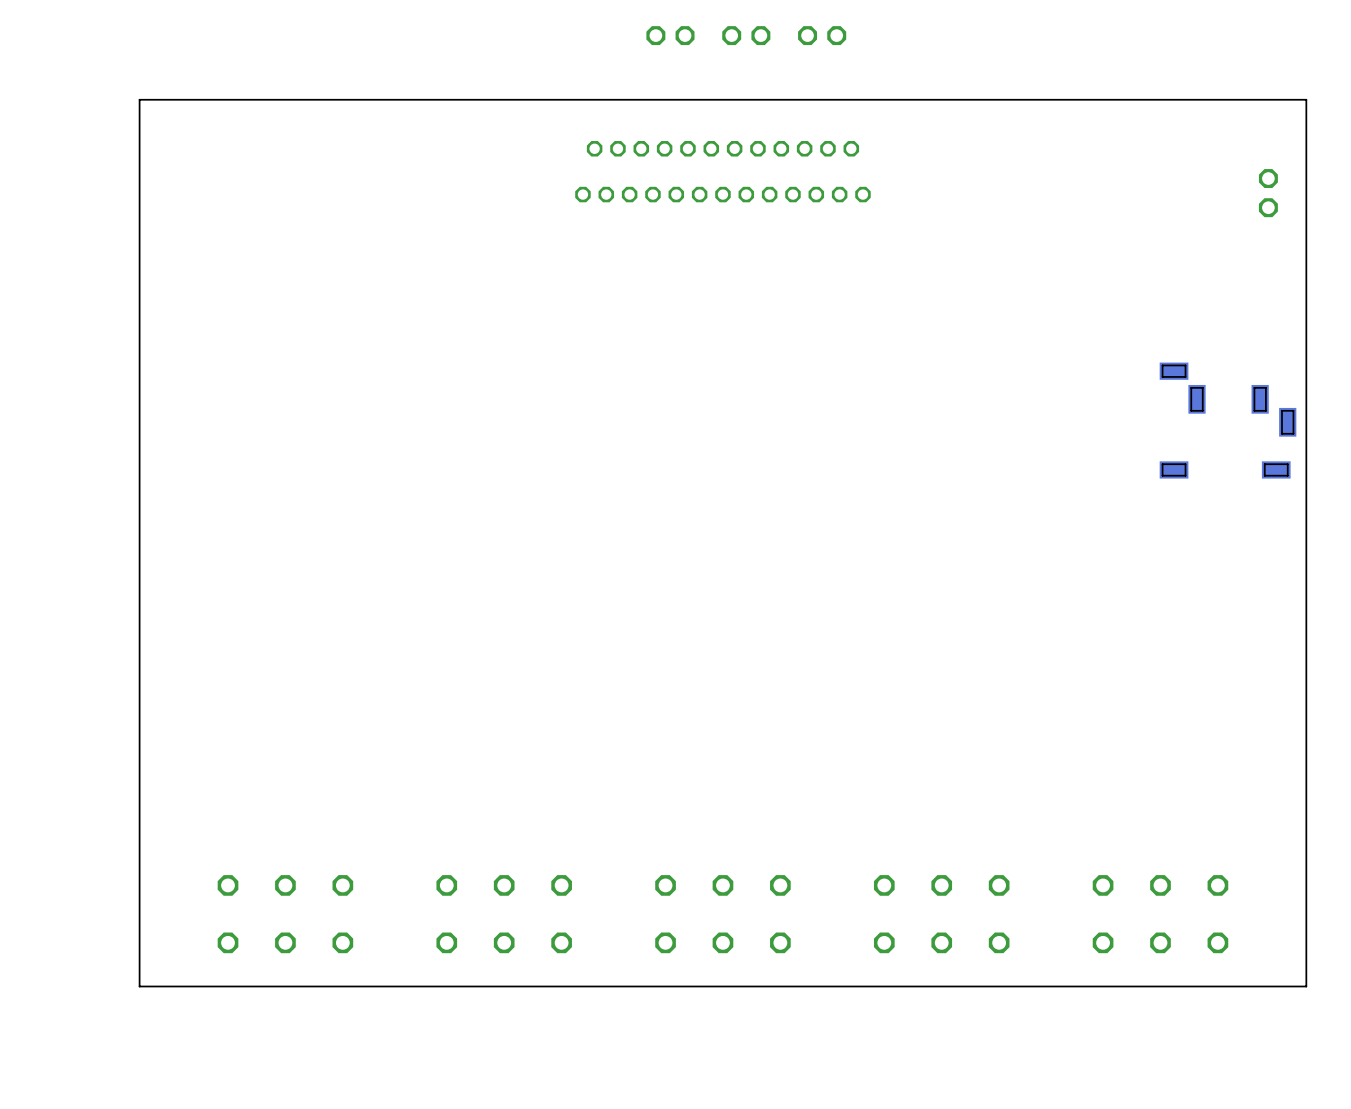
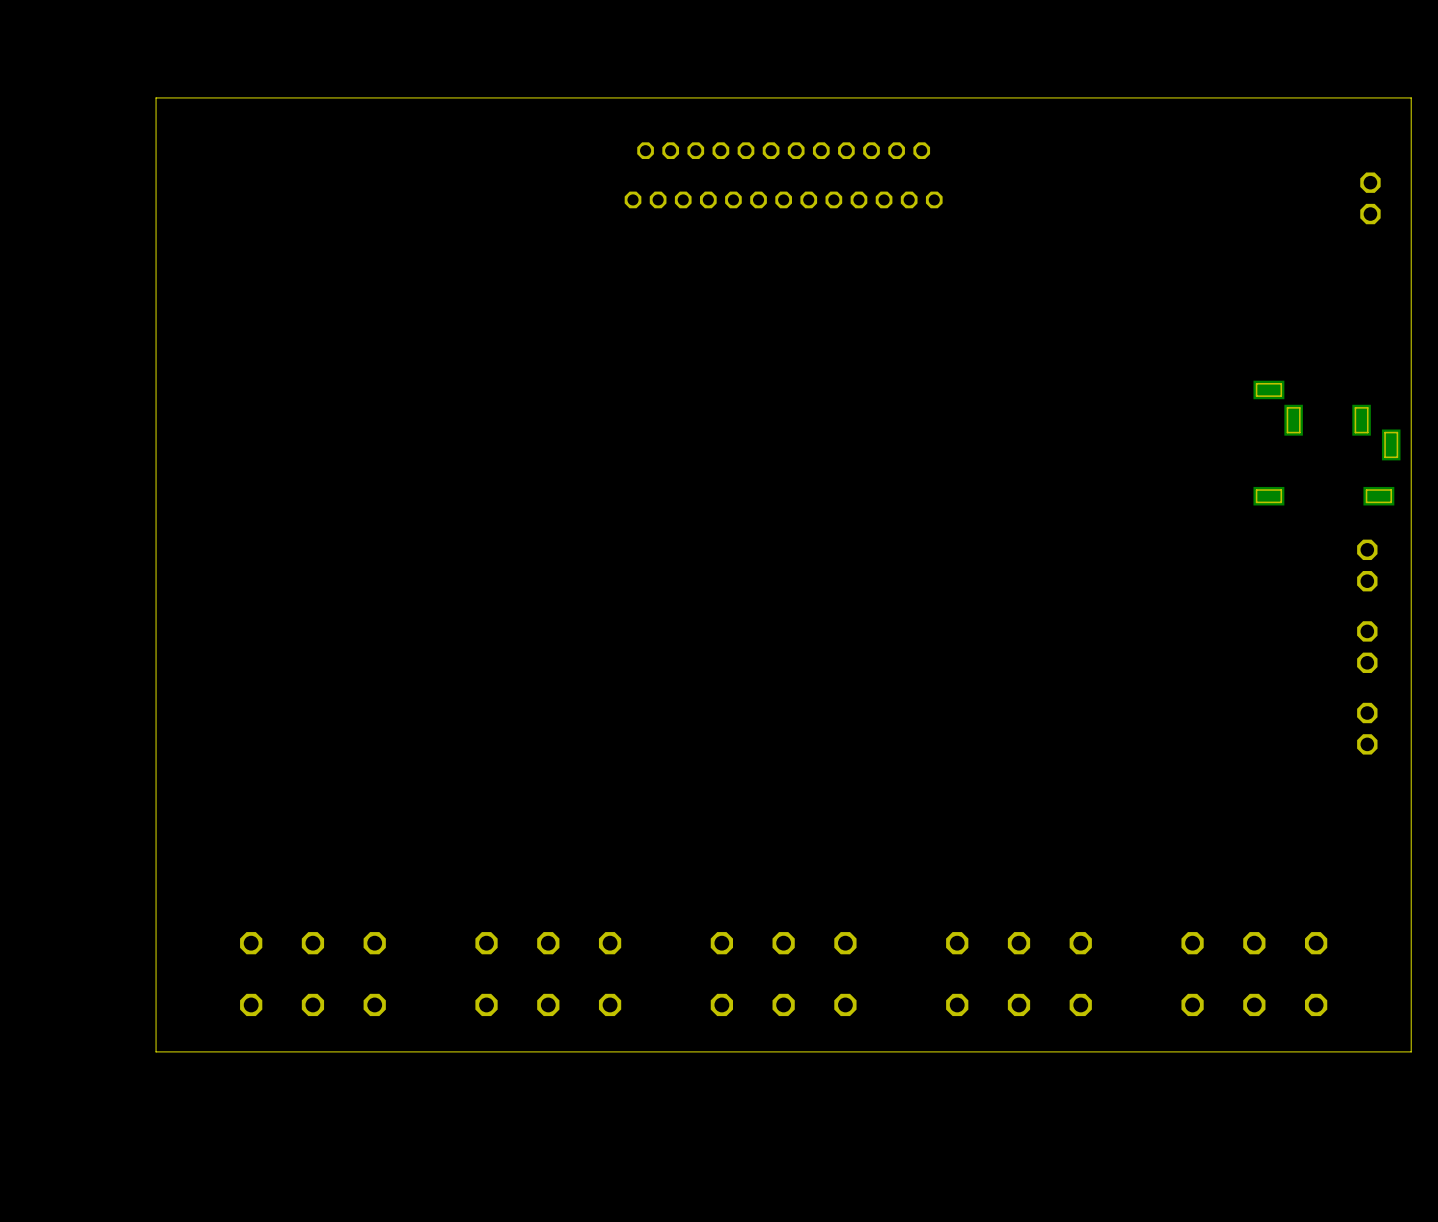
part: (670, 35) -> none
part: (746, 35) -> none
part: (822, 35) -> none
part: none -> (1367, 565)
part: none -> (1367, 647)
part: none -> (1367, 728)

